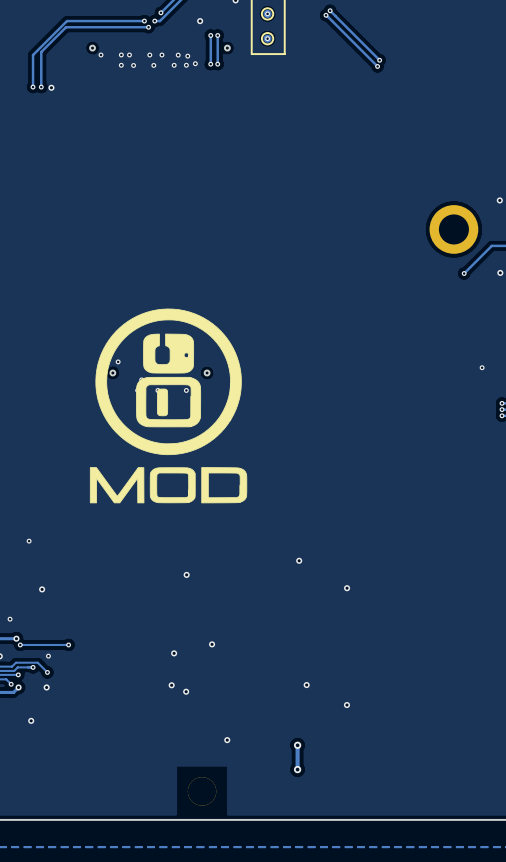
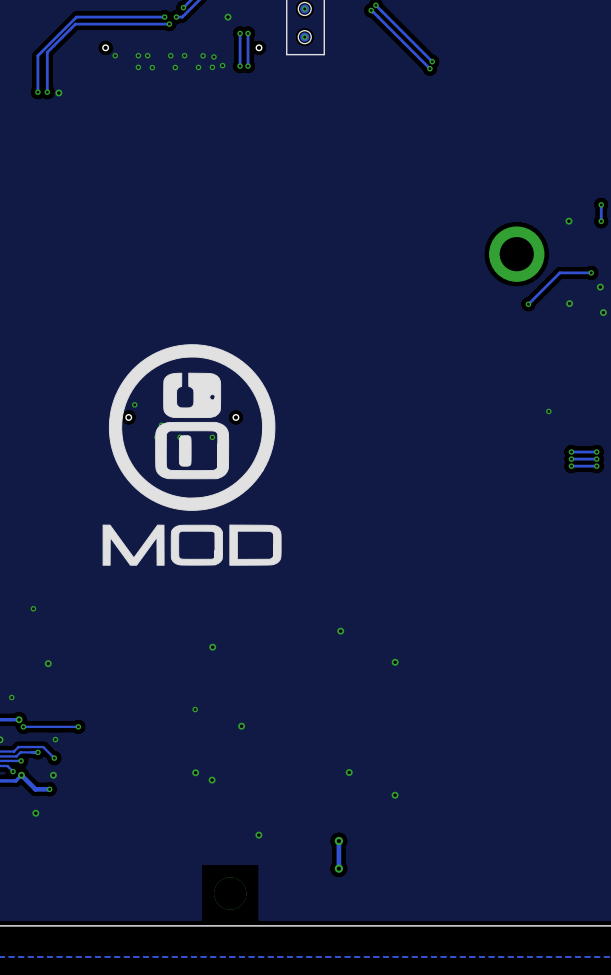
via: none -> (195, 709)
via: (174, 653) -> none
track: none -> (21, 775) (35, 789) (49, 789)
via: none -> (49, 789)

